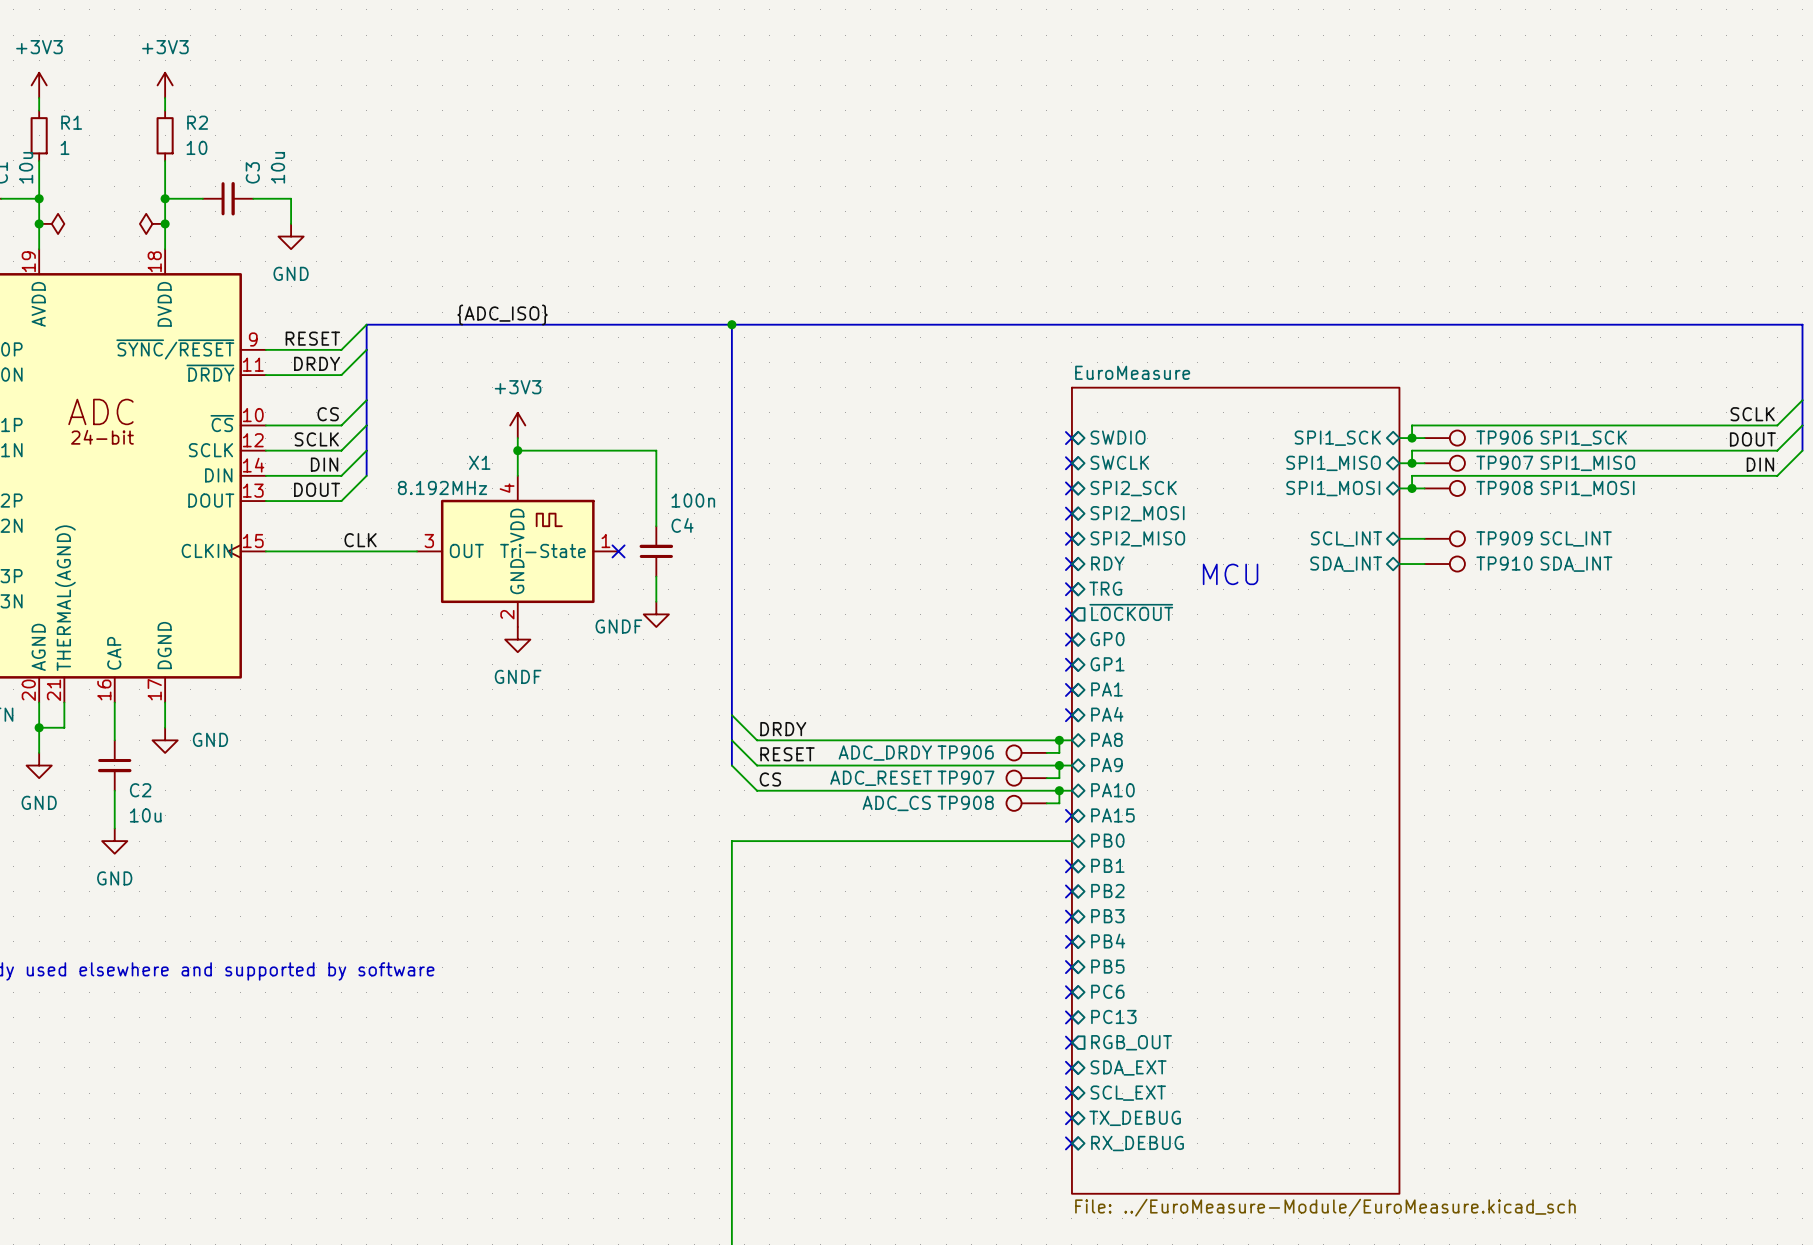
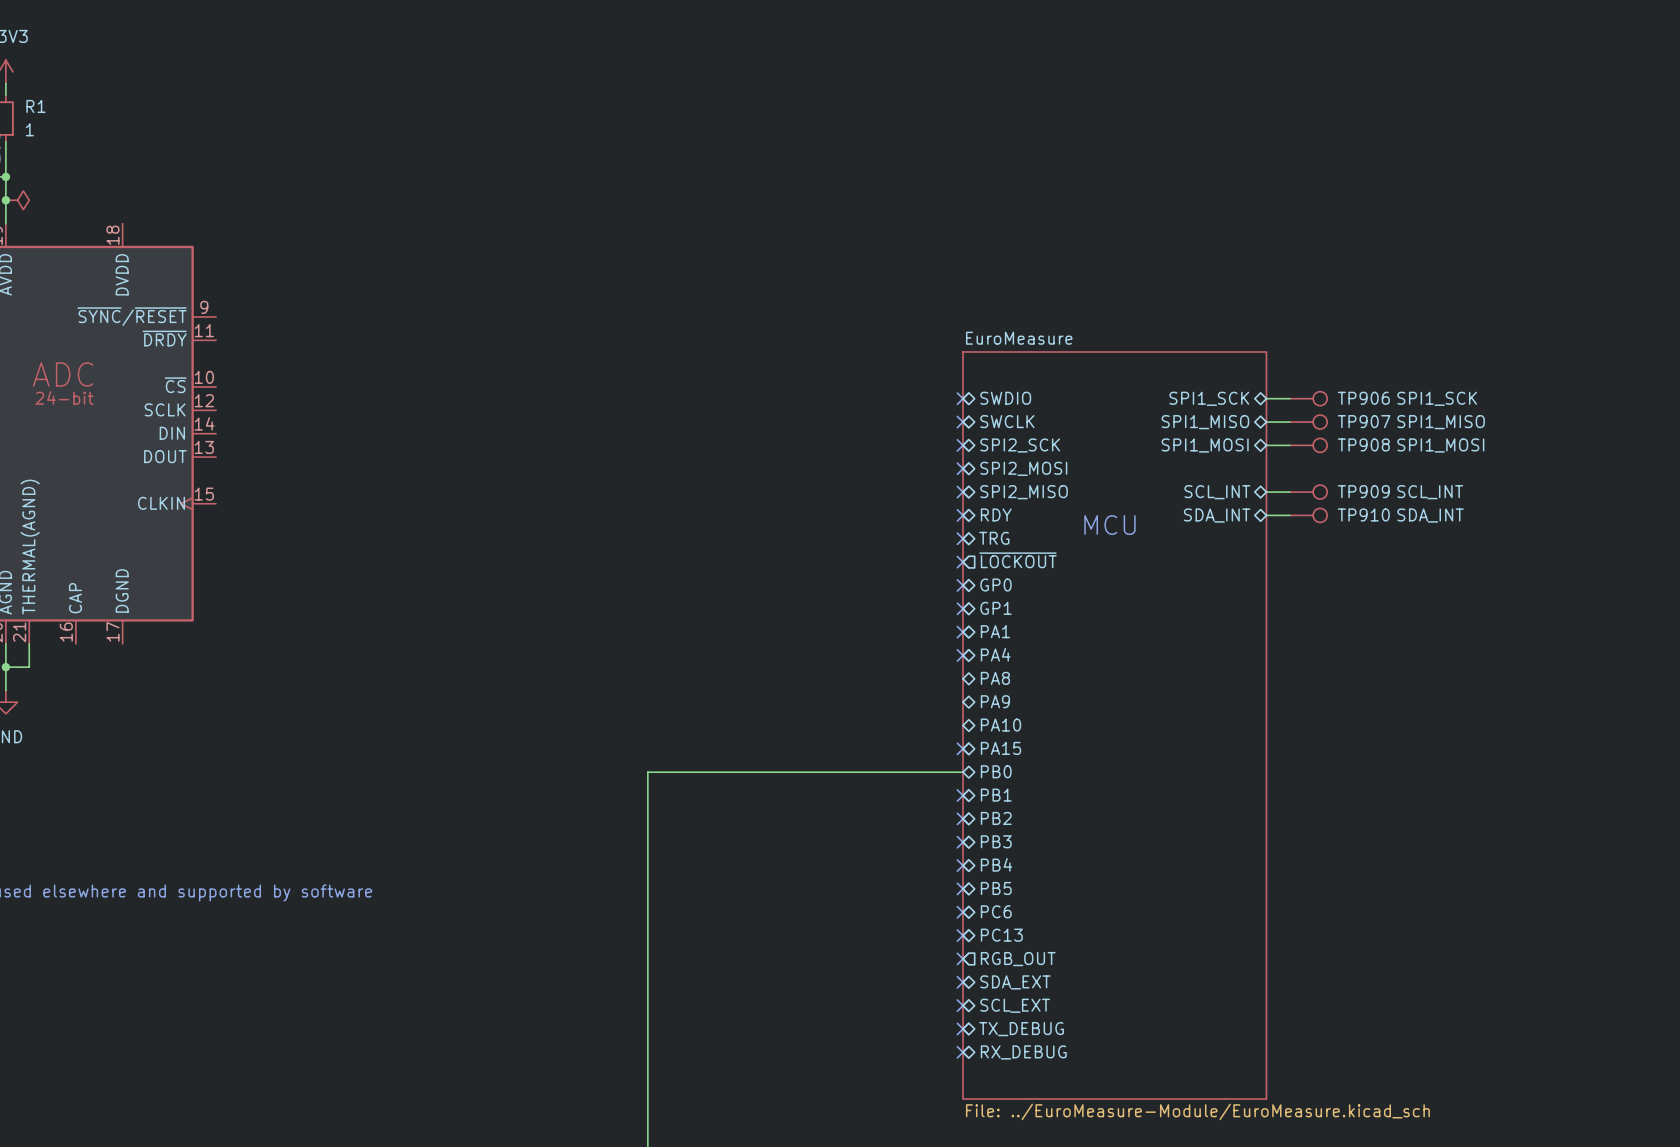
power symbol: +3V3 (165, 85) -> none
wire: (165, 97) (165, 110) -> none
R2: 10 (165, 135) -> none
wire: (165, 160) (165, 249) -> none
wire: (165, 198) (202, 198) -> none
junction: (165, 198) -> none
C3: 10u (228, 198) -> none
wire: (253, 198) (291, 198) (291, 223) -> none
power symbol: (152, 223) -> none
junction: (165, 223) -> none
power symbol: GND (291, 236) -> none
label: {ADC_ISO} (502, 314) -> none
wire: (366, 324) (341, 349) (265, 349) -> none
bus: (731, 324) (731, 765) -> none
junction: (731, 324) -> none
label: RESET (312, 338) -> none
wire: (366, 349) (341, 375) (265, 375) -> none
label: DRDY (317, 363) -> none
wire: (366, 400) (341, 425) (265, 425) -> none
wire: (1802, 400) (1777, 425) (1412, 425) (1412, 438) -> none
label: CS (328, 414) -> none
label: SCLK (1752, 414) -> none
wire: (366, 425) (341, 450) (265, 450) -> none
power symbol: +3V3 (517, 425) -> none
wire: (1802, 425) (1777, 450) (1412, 450) (1412, 463) -> none
wire: (517, 438) (517, 475) -> none
junction: (1412, 438) -> none
label: SCLK (316, 439) -> none
label: DOUT (1752, 439) -> none
wire: (366, 450) (341, 475) (265, 475) -> none
wire: (517, 450) (656, 450) (656, 526) -> none
junction: (517, 450) -> none
wire: (1802, 450) (1777, 475) (1412, 475) (1412, 488) -> none
bus: (1802, 450) (1802, 324) (366, 324) (366, 475) -> none
junction: (1412, 463) -> none
label: DIN (324, 464) -> none
label: DIN (1760, 464) -> none
wire: (366, 475) (341, 501) (265, 501) -> none
junction: (1412, 488) -> none
label: DOUT (317, 489) -> none
label: CLK (360, 540) -> none
wire: (265, 551) (417, 551) -> none
X1: 8.192MHz (517, 551) -> none
no-connect mark: (618, 551) -> none
C4: 100n (656, 551) -> none
wire: (656, 576) (656, 601) -> none
power symbol: GNDF (656, 614) -> none
power symbol: GNDF (517, 639) -> none
wire: (114, 702) (114, 740) -> none
wire: (165, 702) (165, 727) -> none
wire: (731, 715) (757, 740) (1071, 740) -> none
label: DRDY (783, 729) -> none
power symbol: GND (165, 740) -> none
wire: (731, 740) (757, 765) (1071, 765) -> none
wire: (1059, 740) (1059, 752) (1046, 752) -> none
junction: (1059, 740) -> none
TP906: ADC_DRDY (1026, 752) -> none
label: RESET (787, 754) -> none
C2: 10u (114, 765) -> none
wire: (731, 765) (757, 790) (1071, 790) -> none
wire: (1059, 765) (1059, 778) (1046, 778) -> none
junction: (1059, 765) -> none
TP907: ADC_RESET (1026, 778) -> none
label: CS (770, 779) -> none
wire: (114, 790) (114, 828) -> none
wire: (1059, 790) (1059, 803) (1046, 803) -> none
junction: (1059, 790) -> none
TP908: ADC_CS (1026, 803) -> none
power symbol: GND (114, 841) -> none

